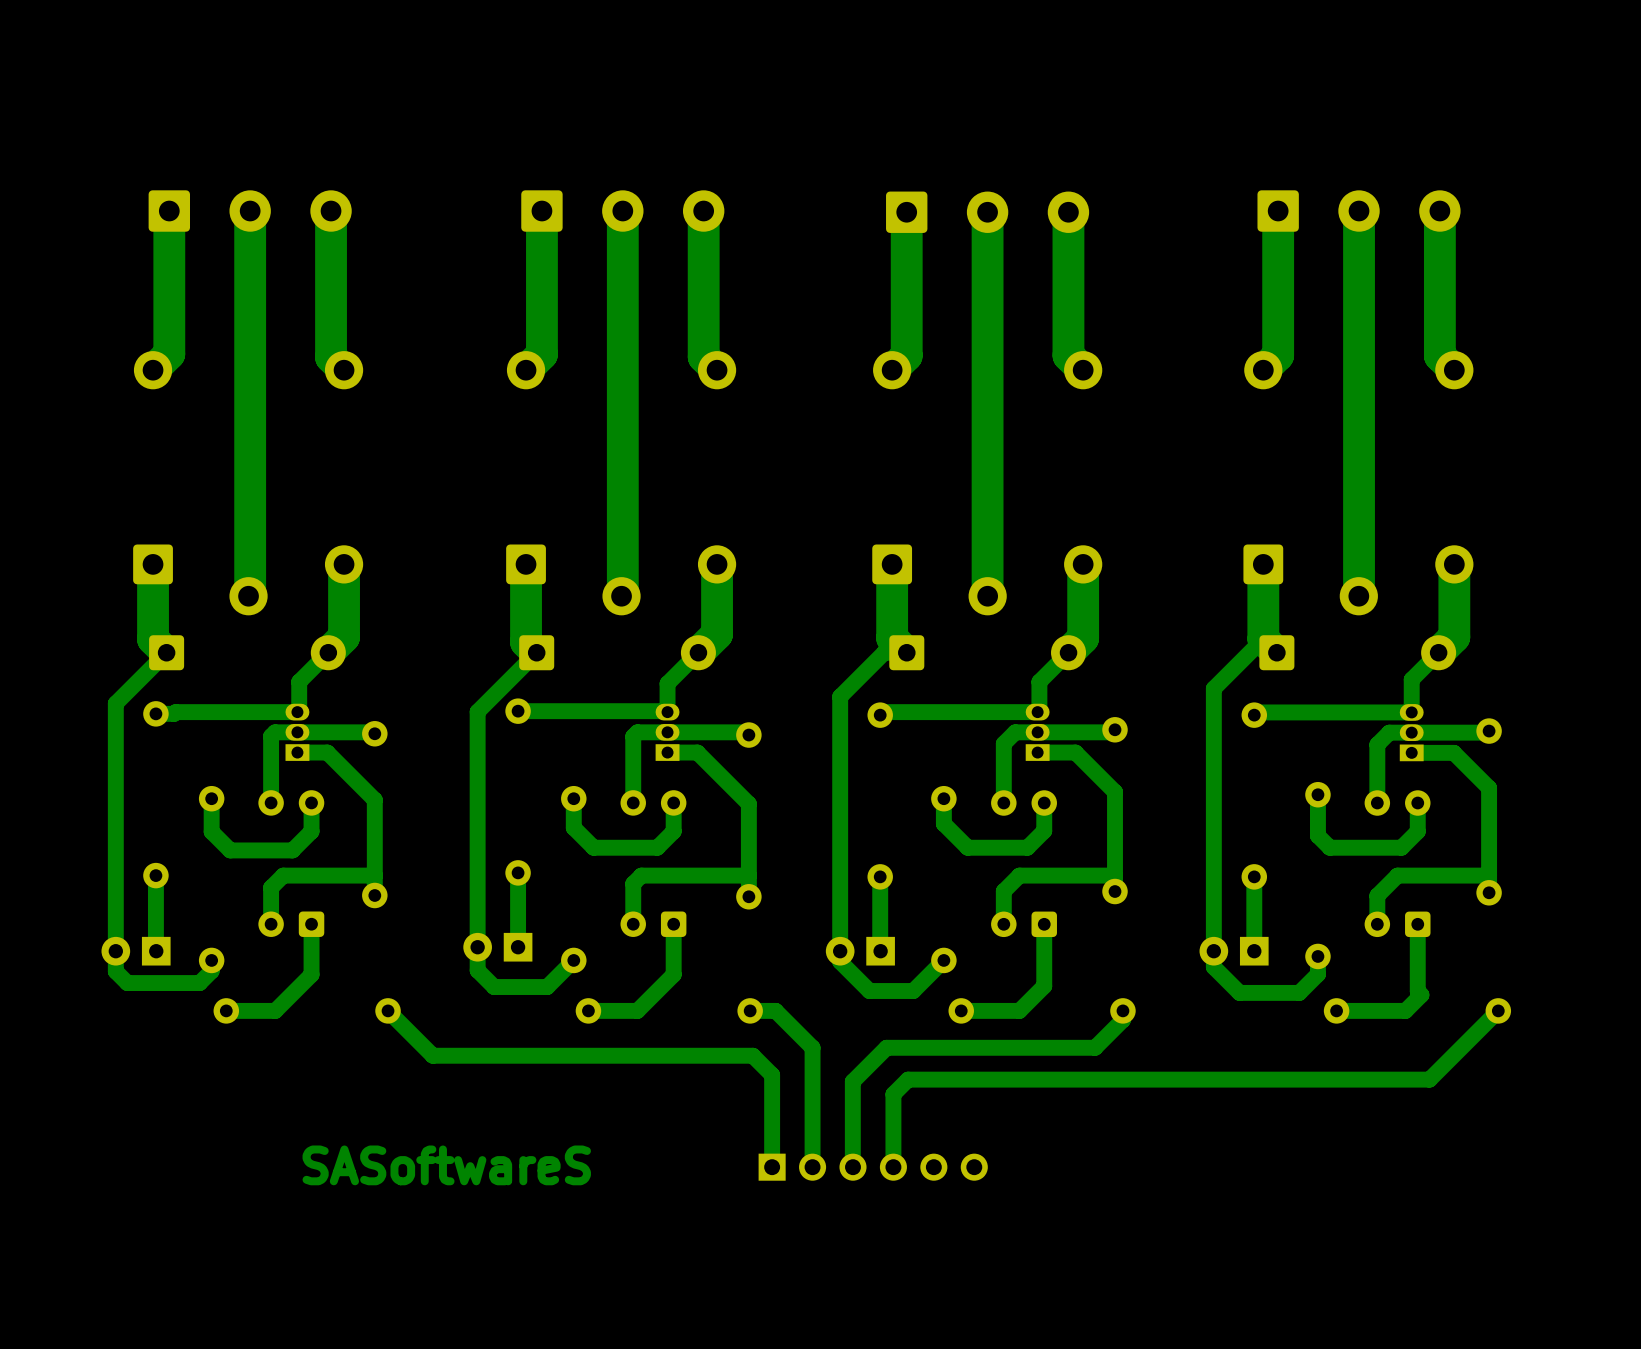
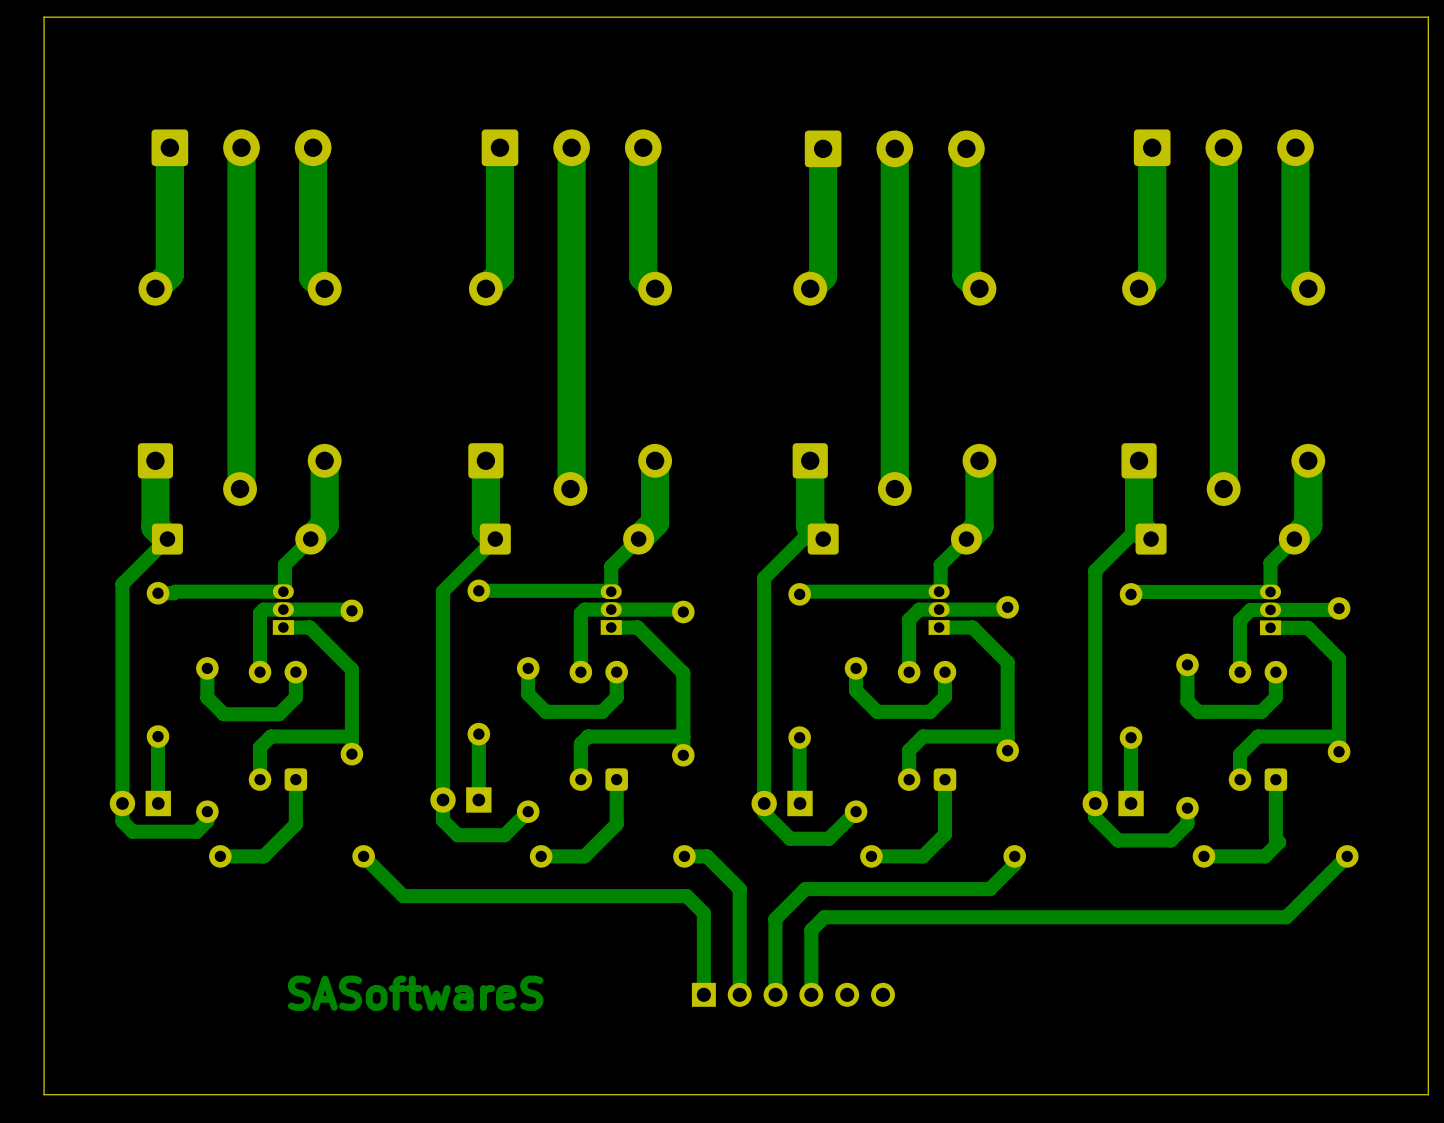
board edge: none -> (1428, 17) (44, 17) (44, 1094) (1428, 1094) (1428, 17)

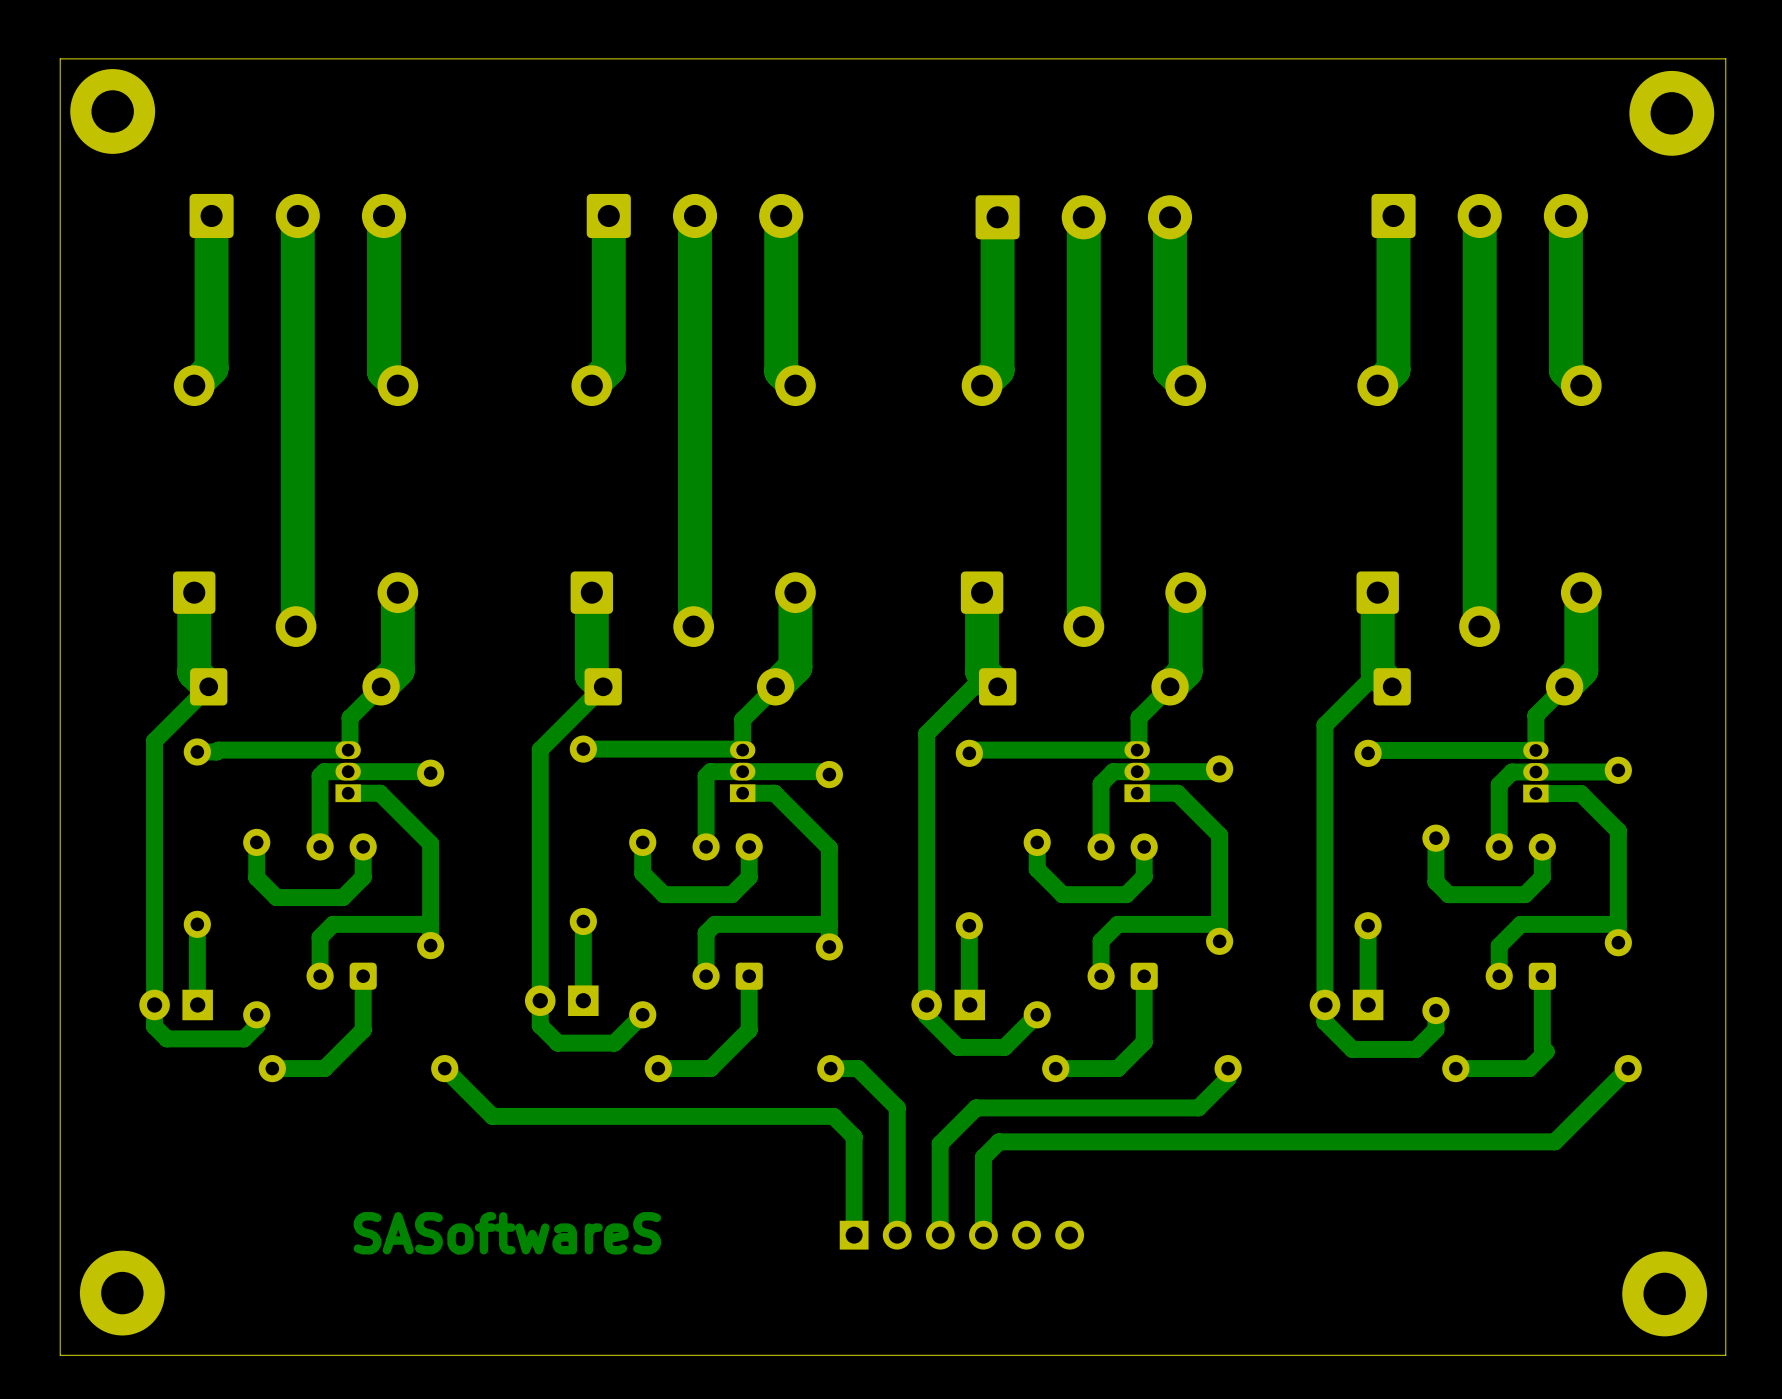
part: none -> (112, 111)
part: none -> (1671, 113)
part: none -> (122, 1293)
part: none -> (1664, 1293)

